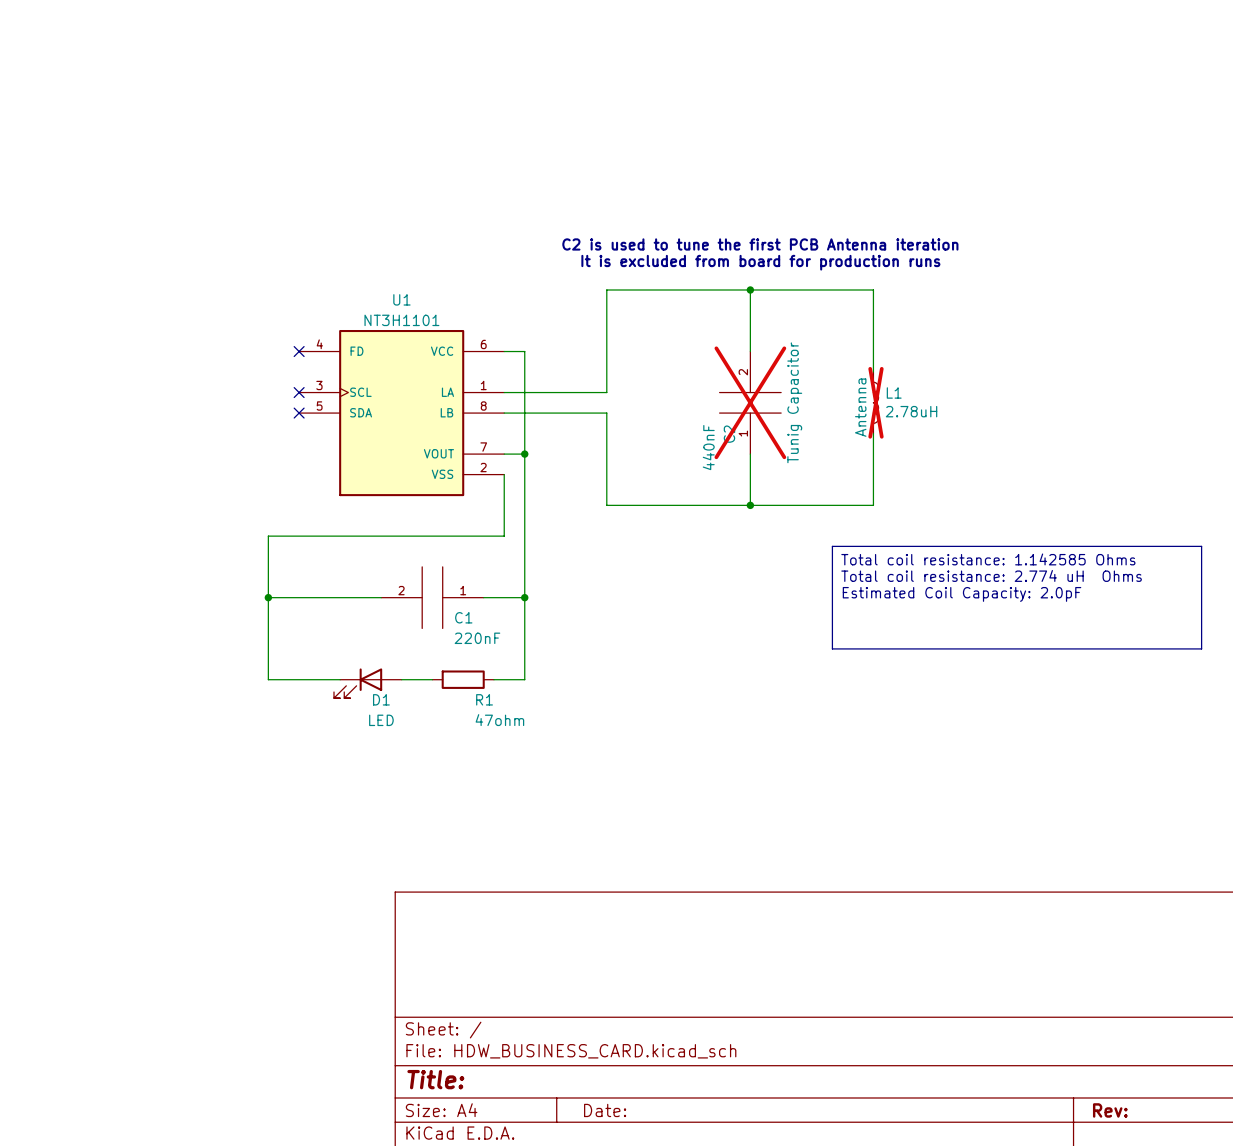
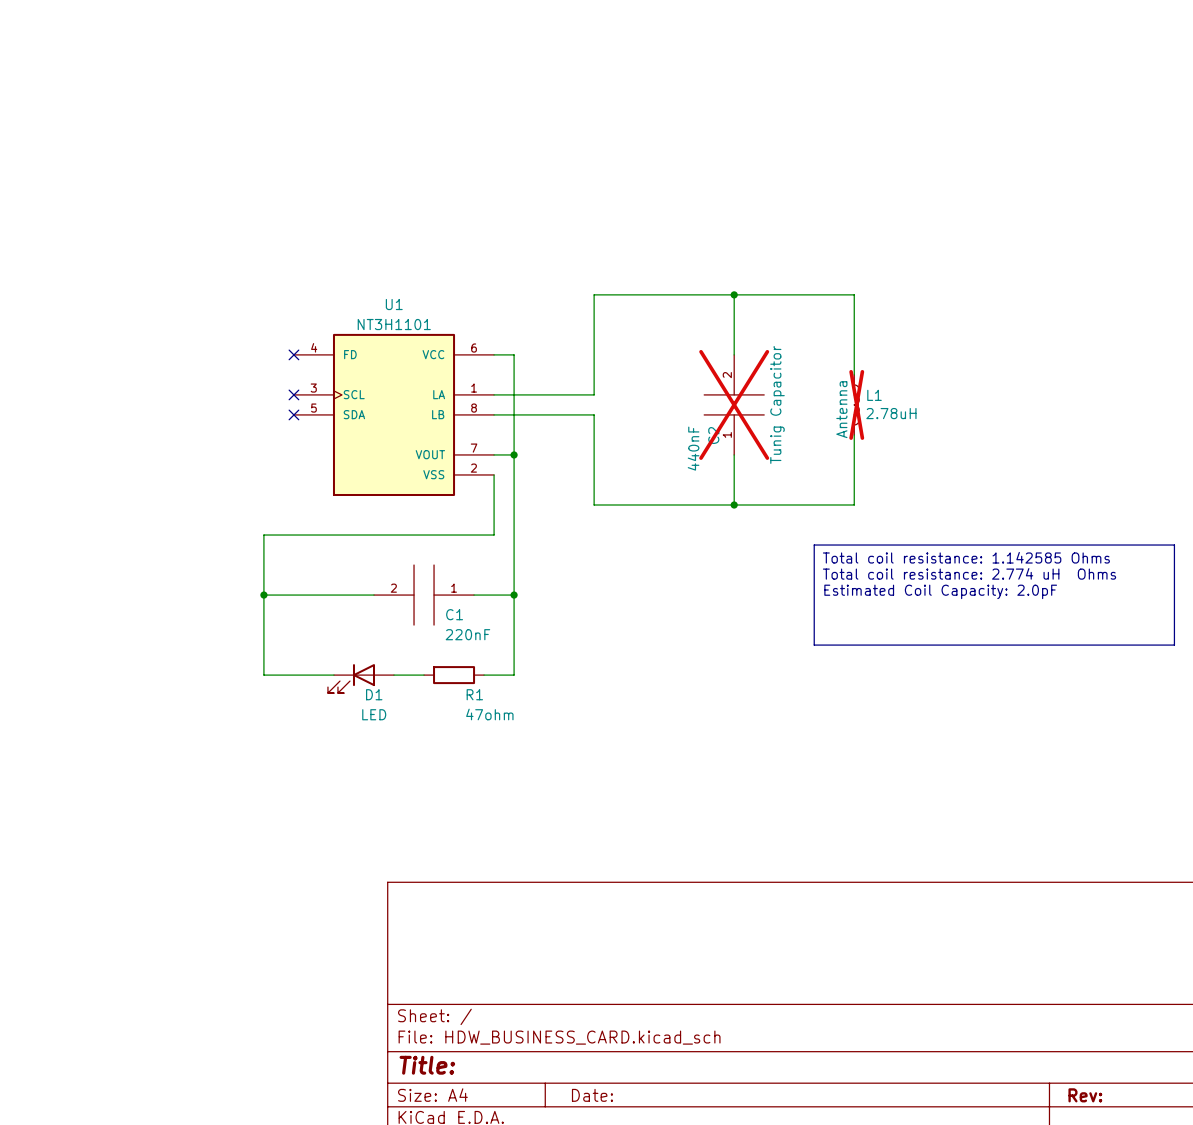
text: C2 is used to tune the first PCB Antenna iteration (760, 244) -> none
text: It is excluded from board for production runs (760, 262) -> none

